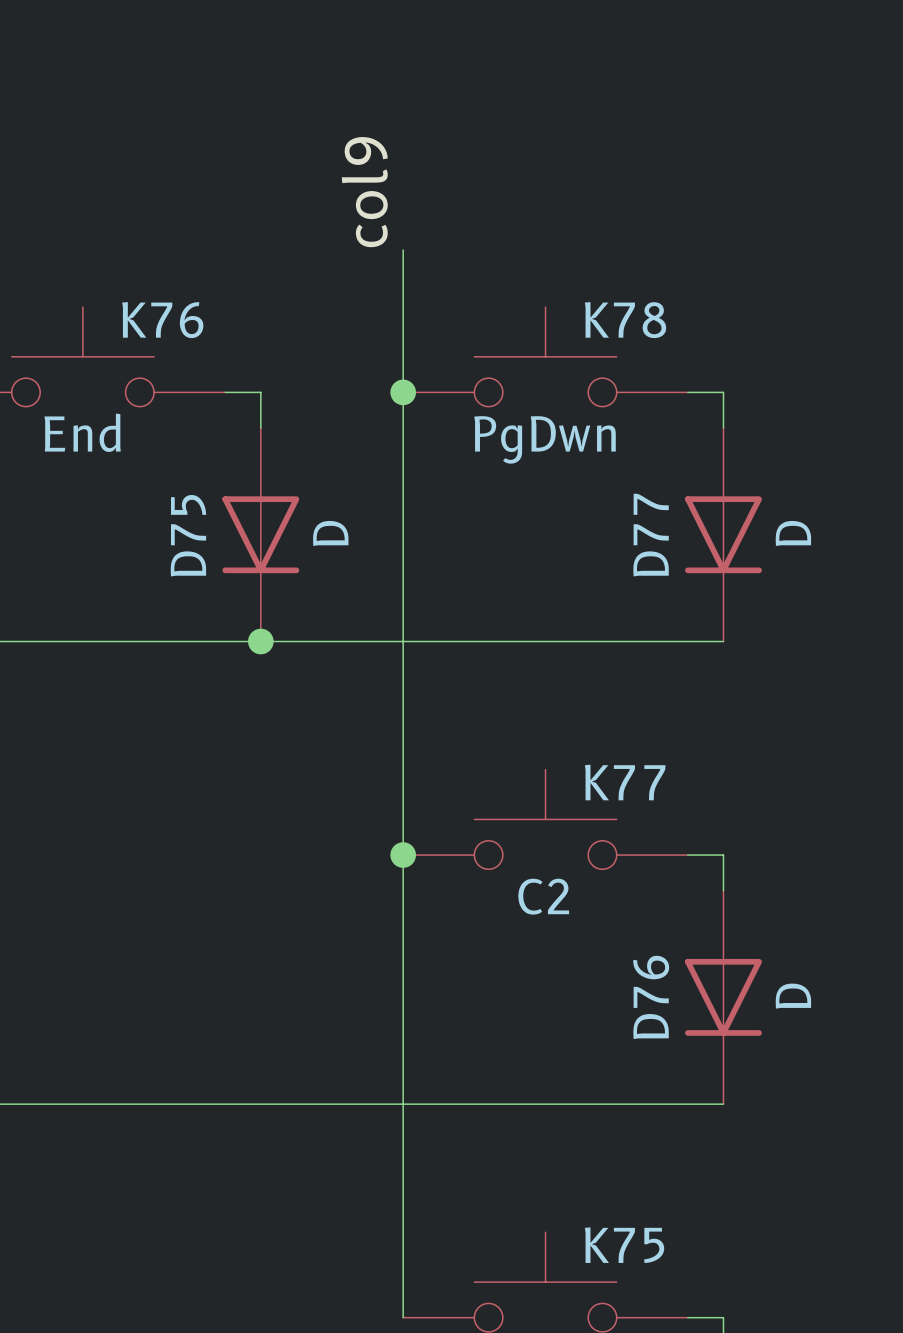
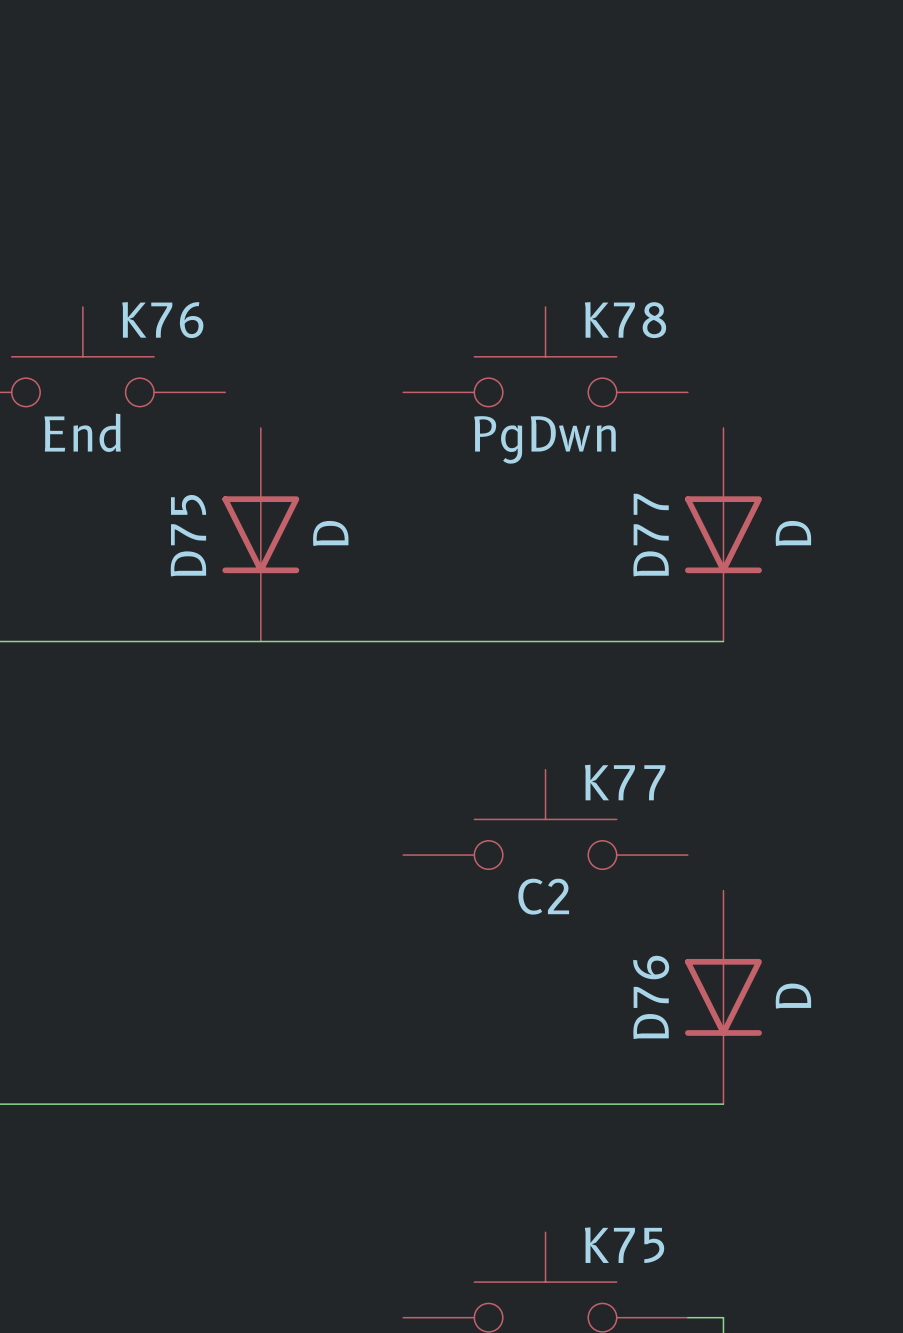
label: col9 (364, 192) -> none
wire: (403, 250) (403, 1317) -> none
wire: (225, 392) (260, 392) (260, 427) -> none
junction: (403, 392) -> none
wire: (687, 392) (723, 392) (723, 427) -> none
junction: (260, 641) -> none
junction: (403, 855) -> none
wire: (687, 855) (723, 855) (723, 890) -> none

